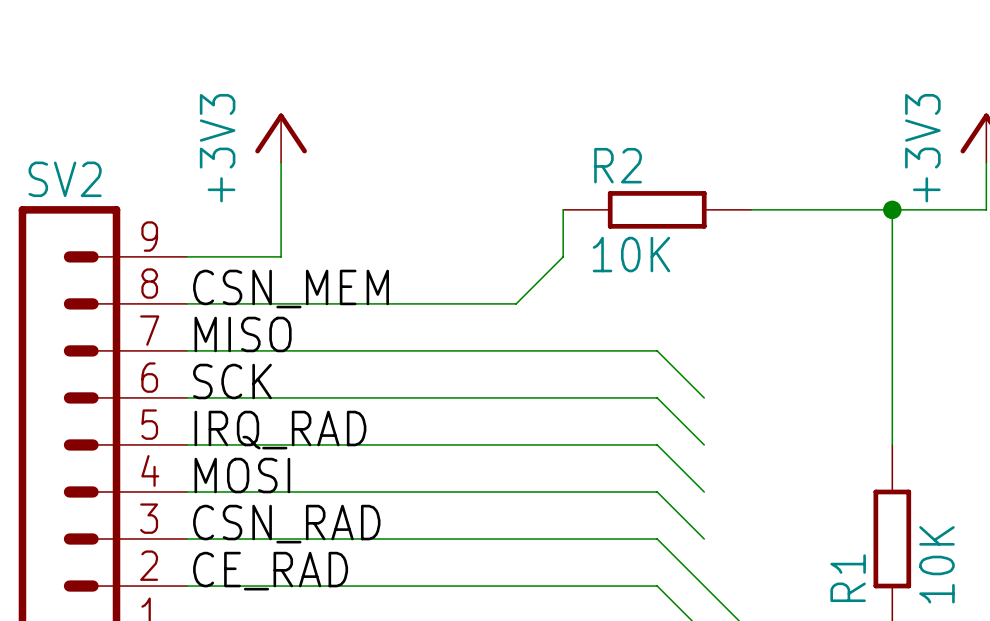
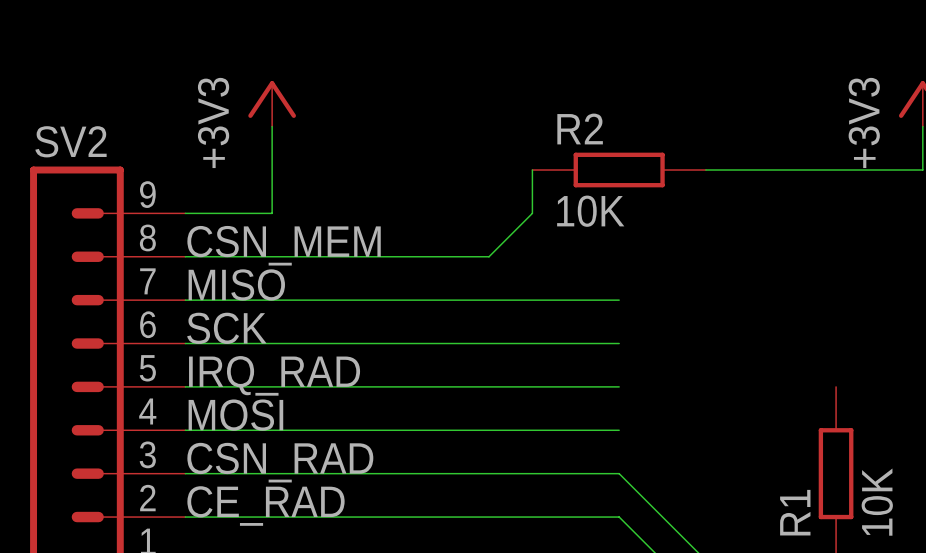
wire: (892, 209) (892, 444) -> none
junction: (892, 209) -> none
wire: (657, 350) (704, 397) -> none
wire: (657, 397) (704, 444) -> none
wire: (657, 444) (704, 491) -> none
wire: (657, 491) (704, 539) -> none

